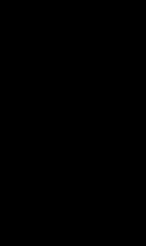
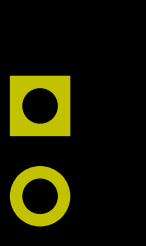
part: none -> (40, 151)

